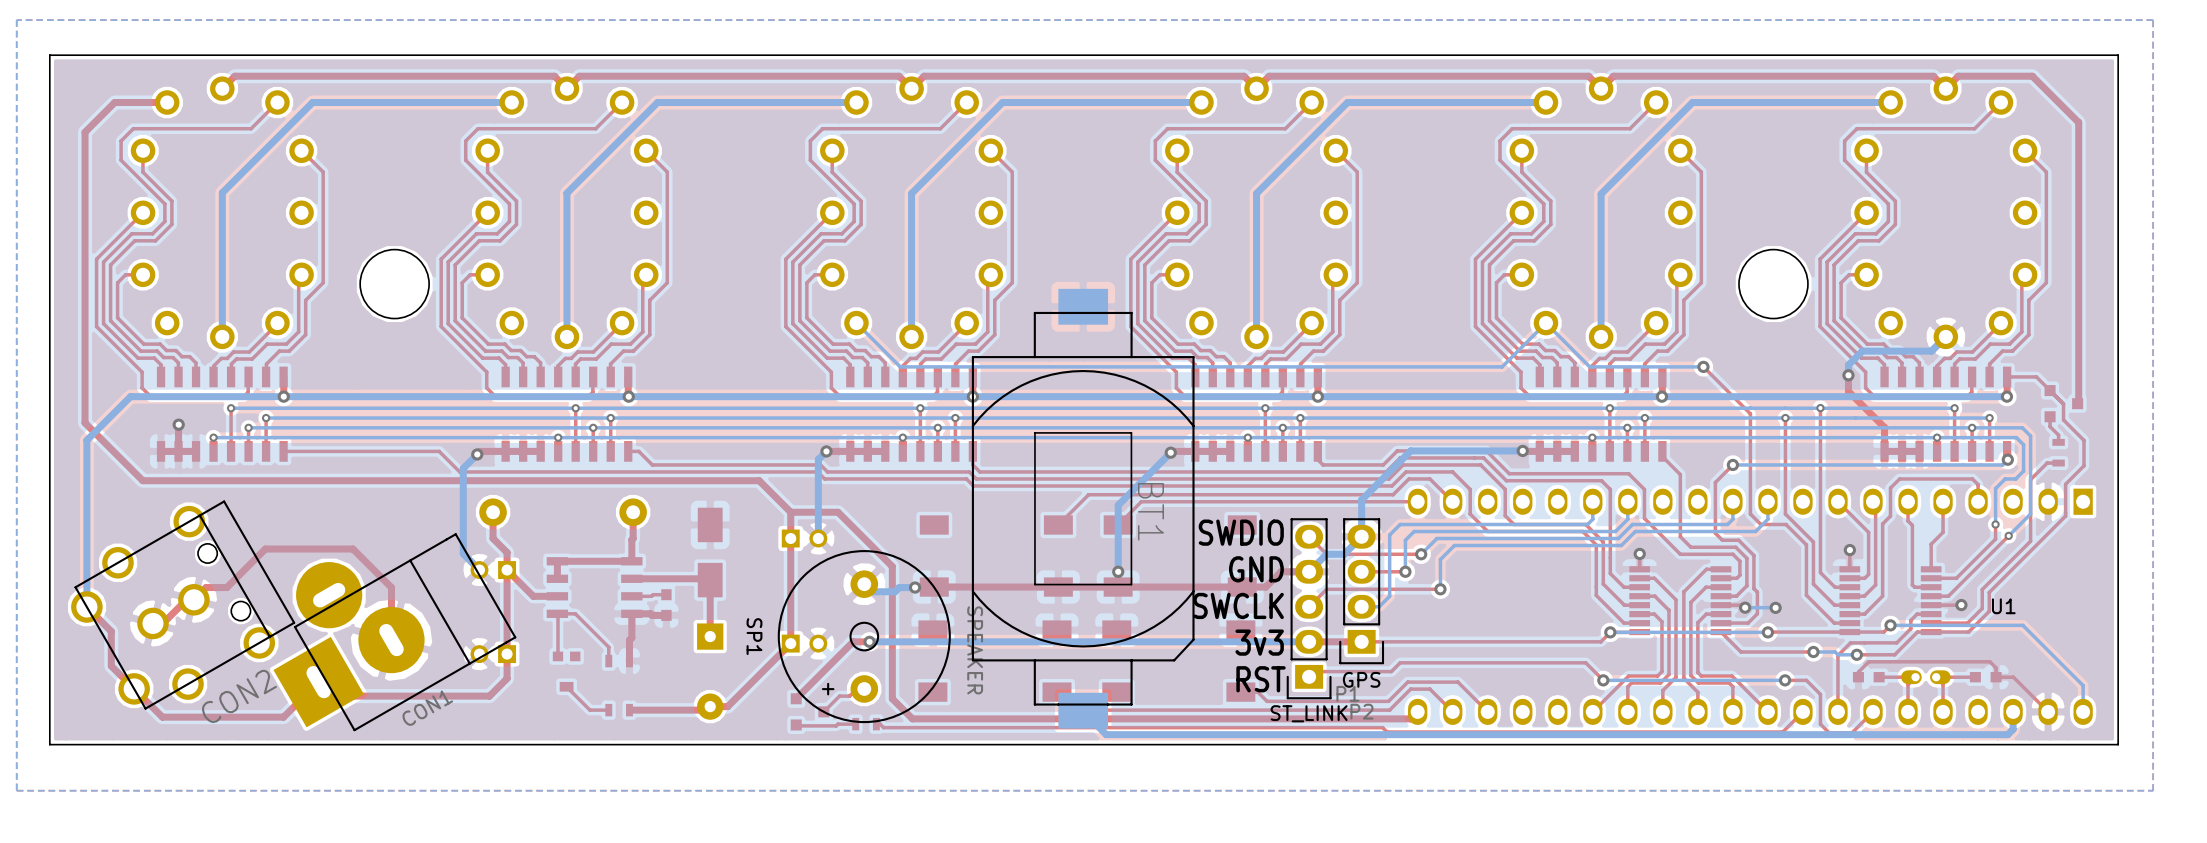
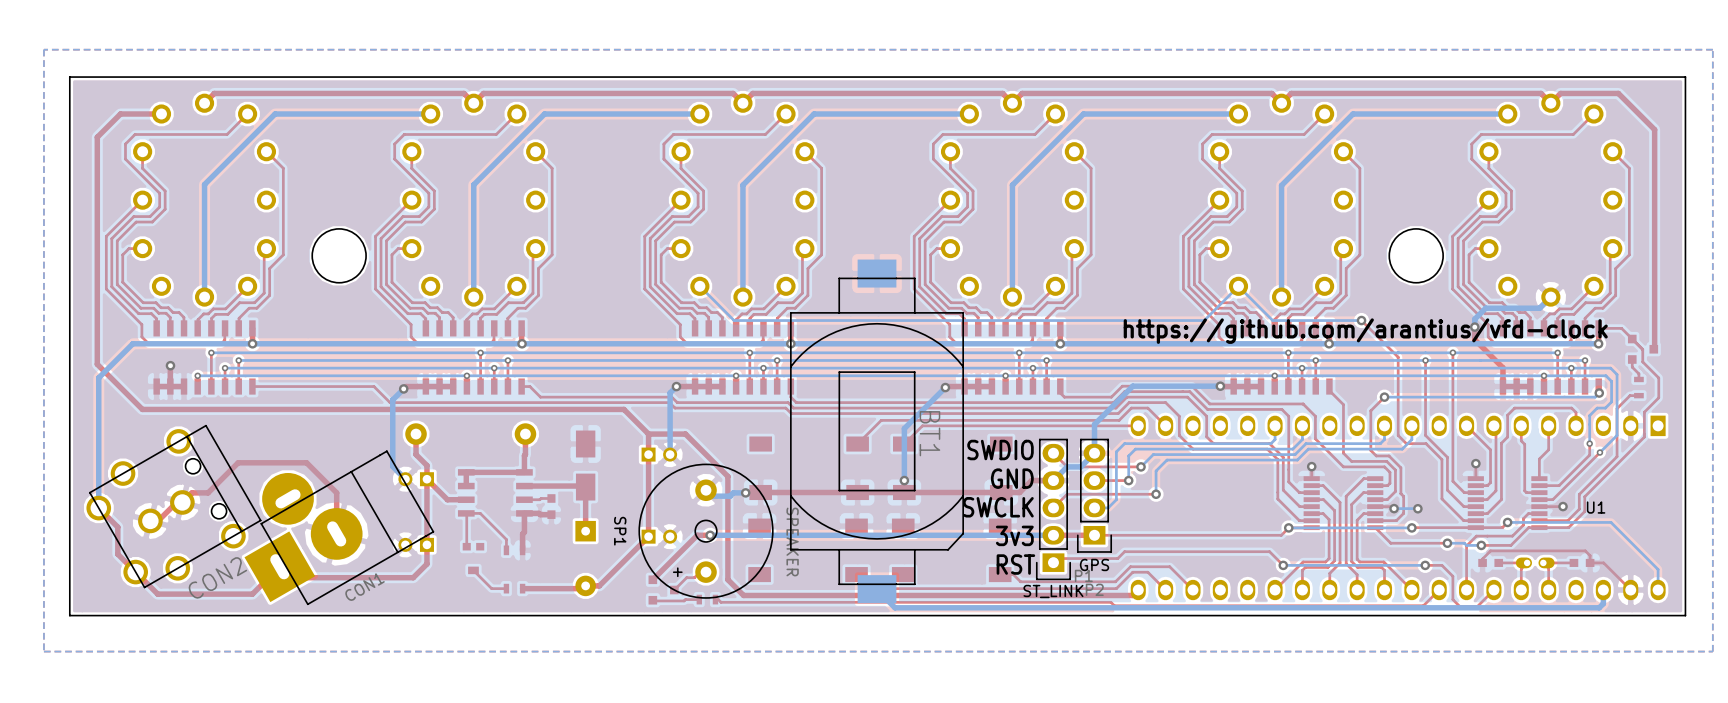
text: none -> https://github.com/arantius/vfd-clock (1365, 331)

